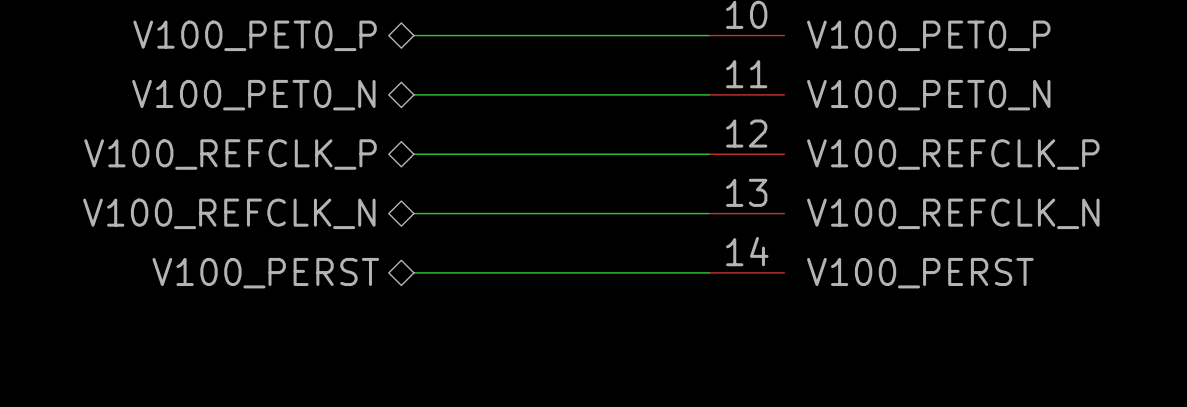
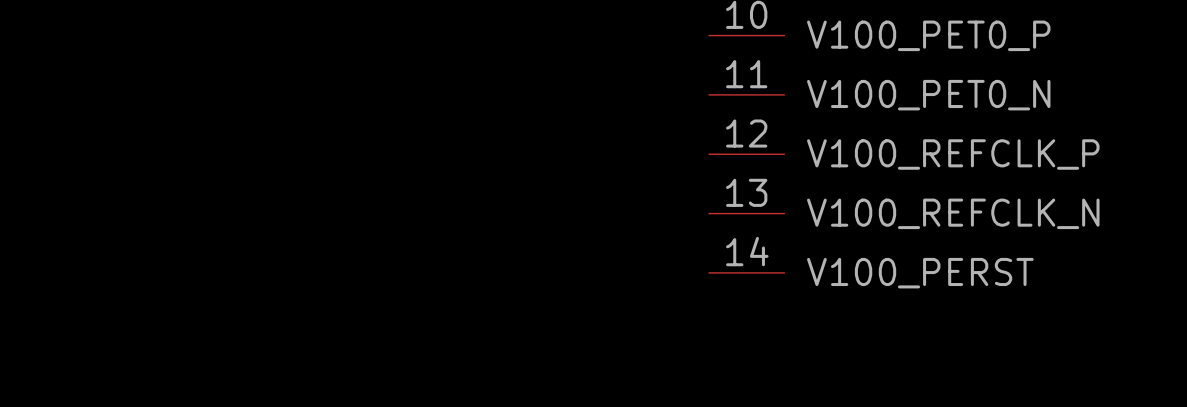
hierarchical label: V100_PET0_P (255, 35) -> none
wire: (413, 35) (709, 35) -> none
wire: (413, 94) (709, 94) -> none
hierarchical label: V100_PET0_N (253, 95) -> none
hierarchical label: V100_REFCLK_P (230, 154) -> none
wire: (413, 154) (709, 154) -> none
hierarchical label: V100_REFCLK_N (229, 213) -> none
wire: (413, 213) (709, 213) -> none
wire: (413, 272) (709, 272) -> none
hierarchical label: V100_PERST (265, 273) -> none

